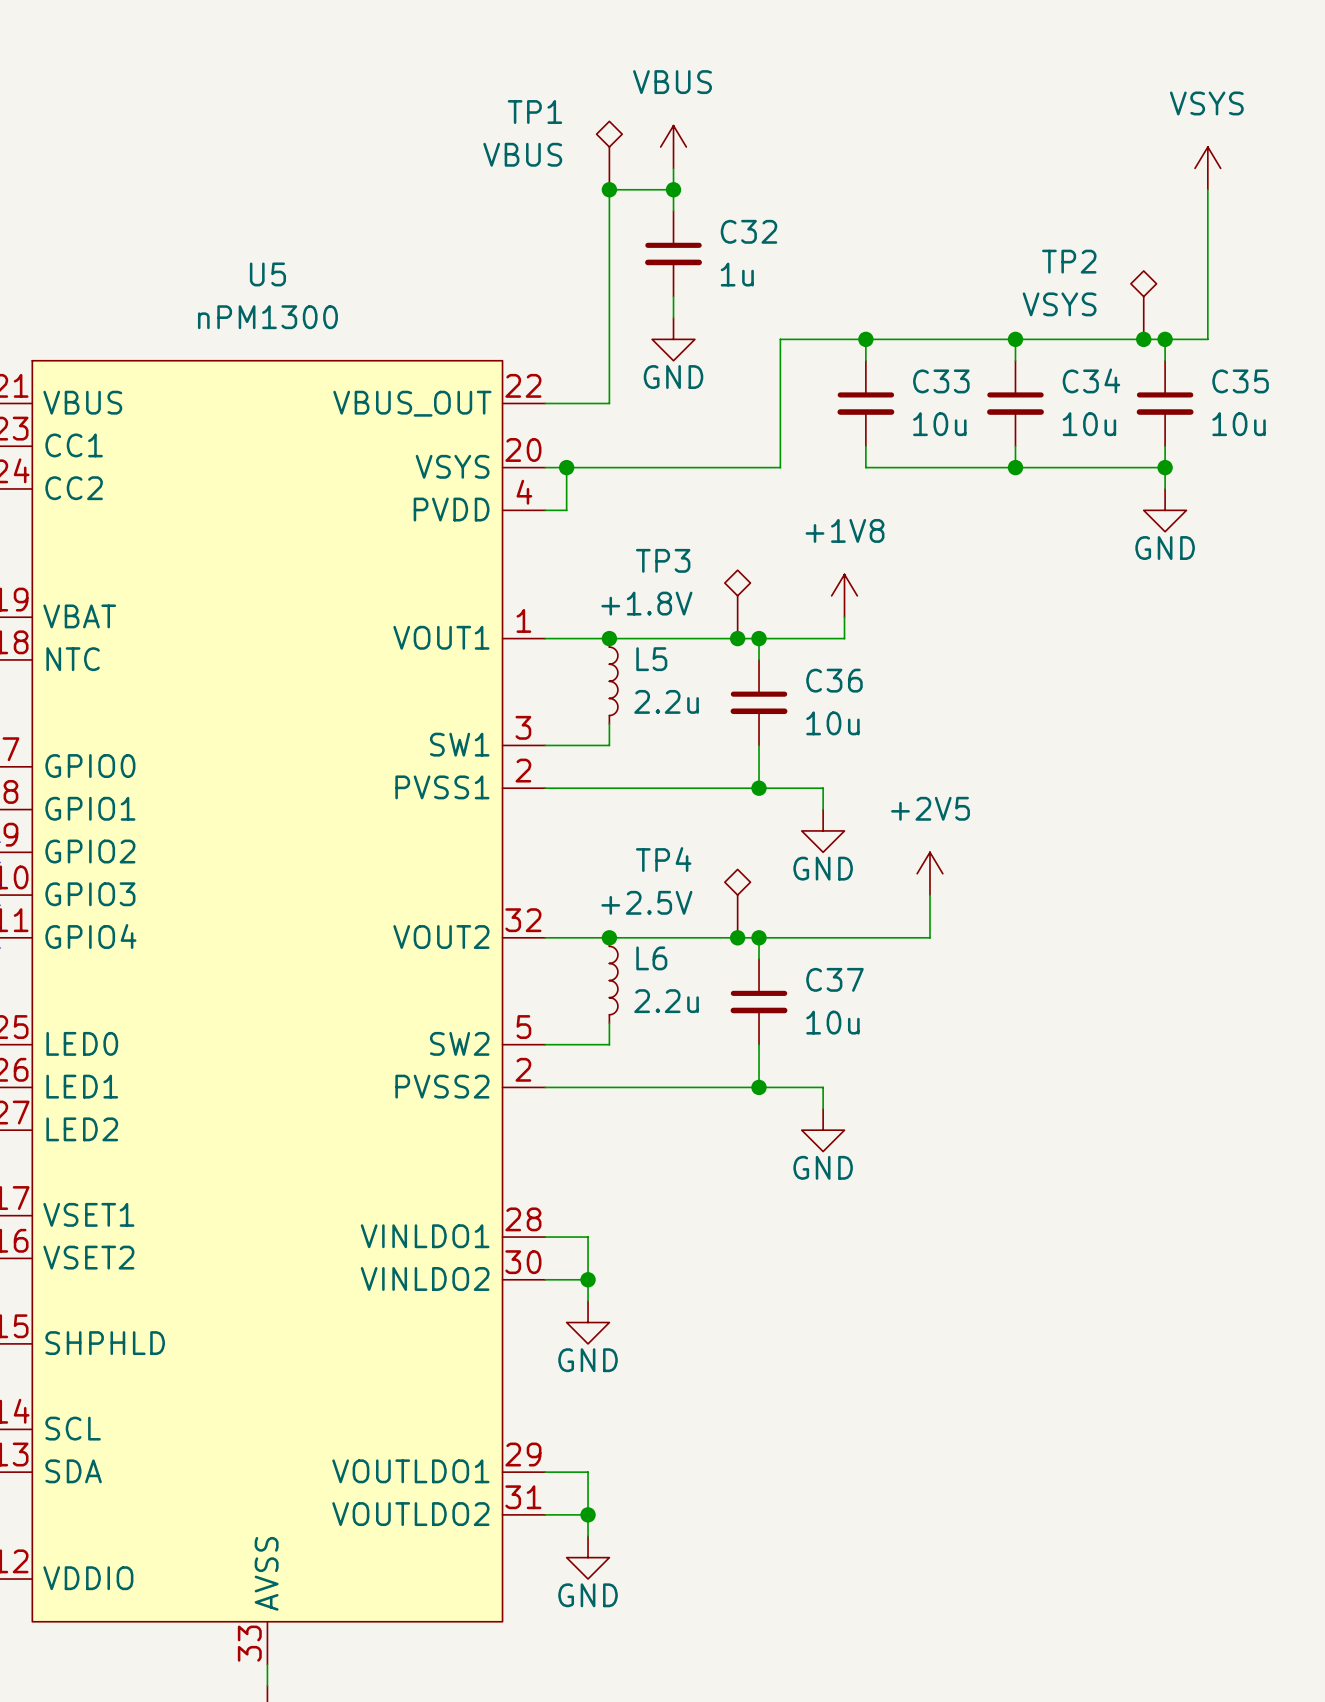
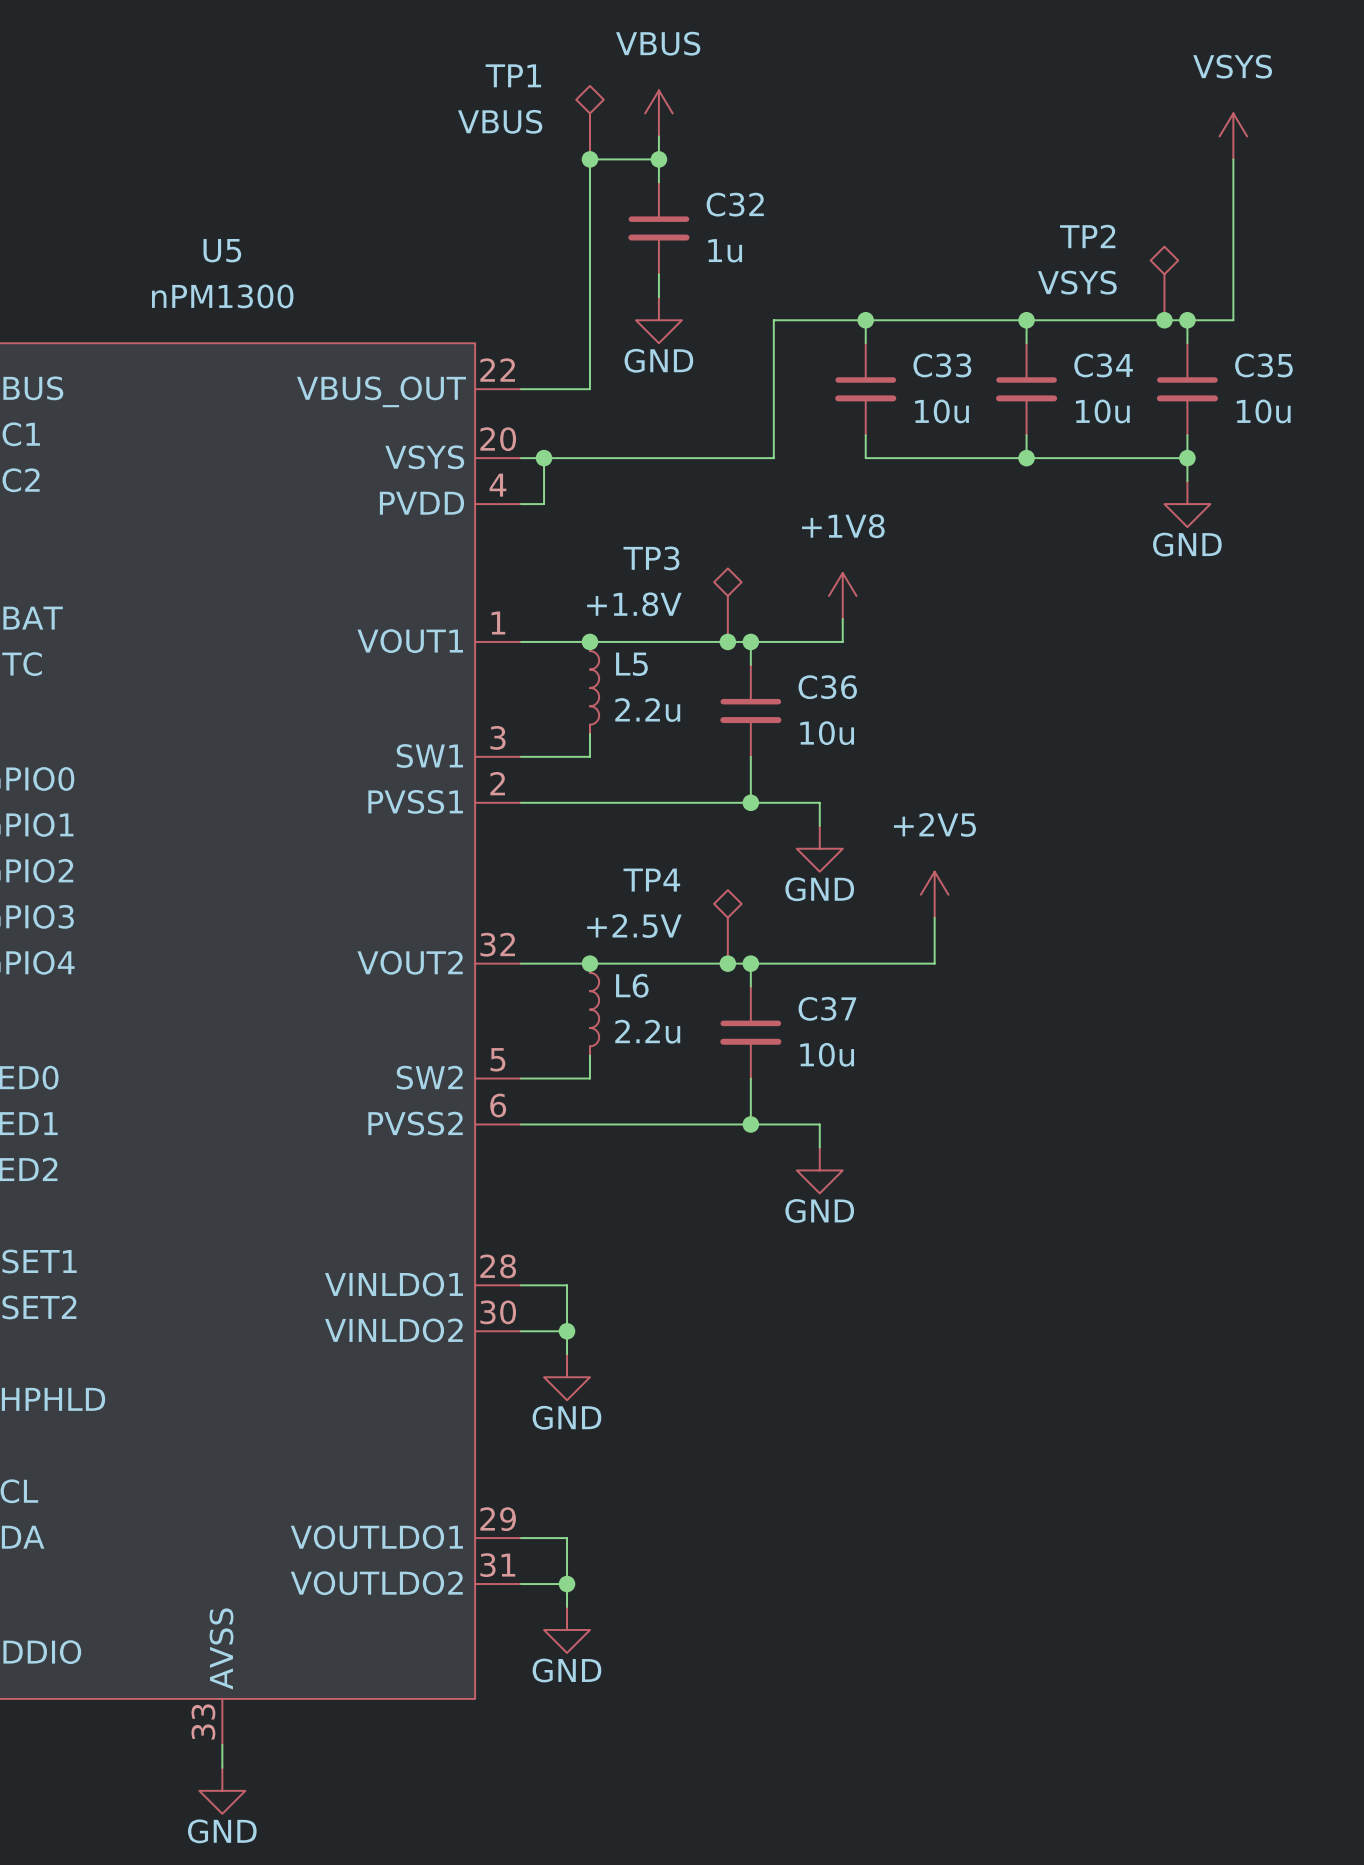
U5 pin number: 2 (523, 1069) -> 6 (498, 1105)

